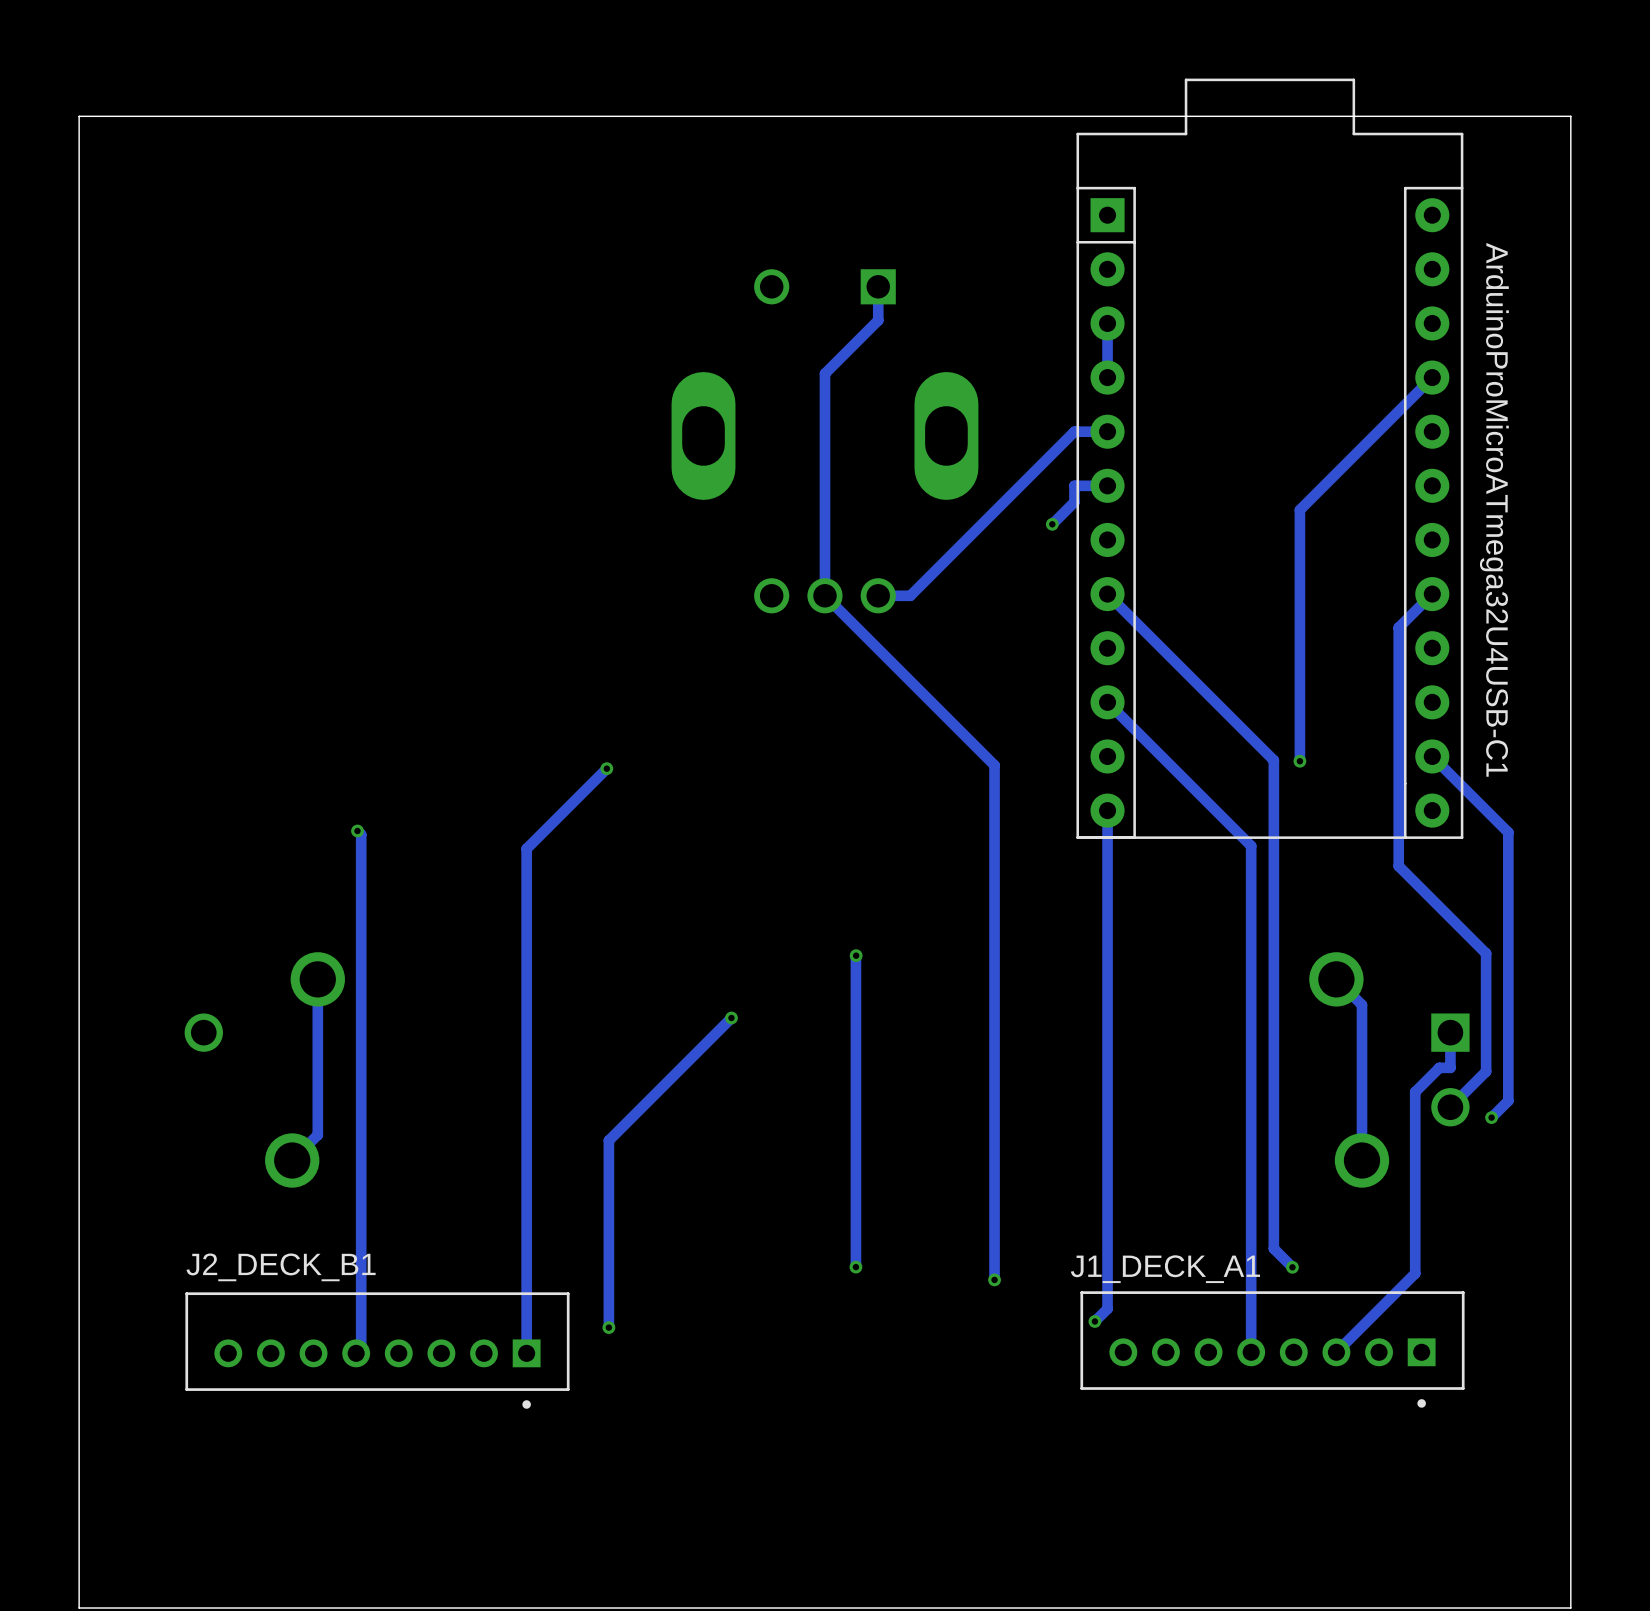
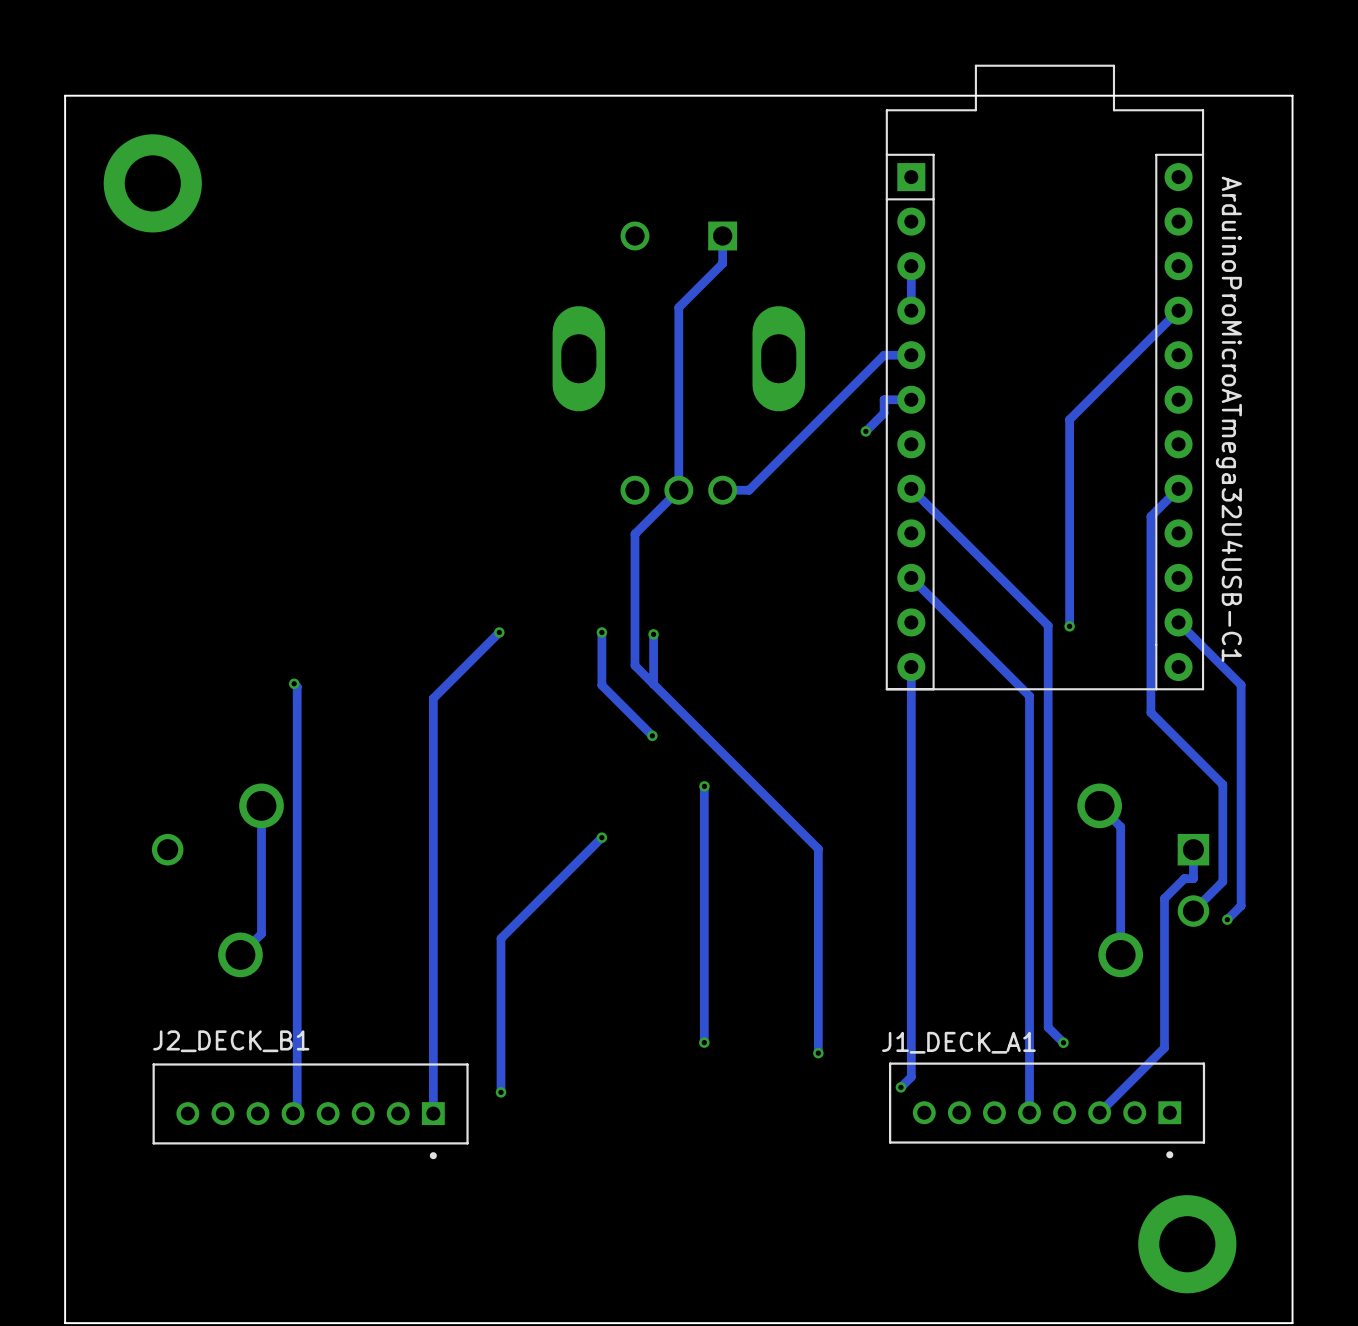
part: none -> (152, 183)
track: (824, 595) (994, 765) (994, 1031) -> (678, 490) (634, 534) (634, 665) (818, 848)
track: none -> (601, 632) (601, 685) (652, 735)
via: none -> (601, 632)
track: none -> (653, 634) (653, 684)
via: none -> (653, 634)
via: none -> (652, 735)
part: none -> (1187, 1244)

